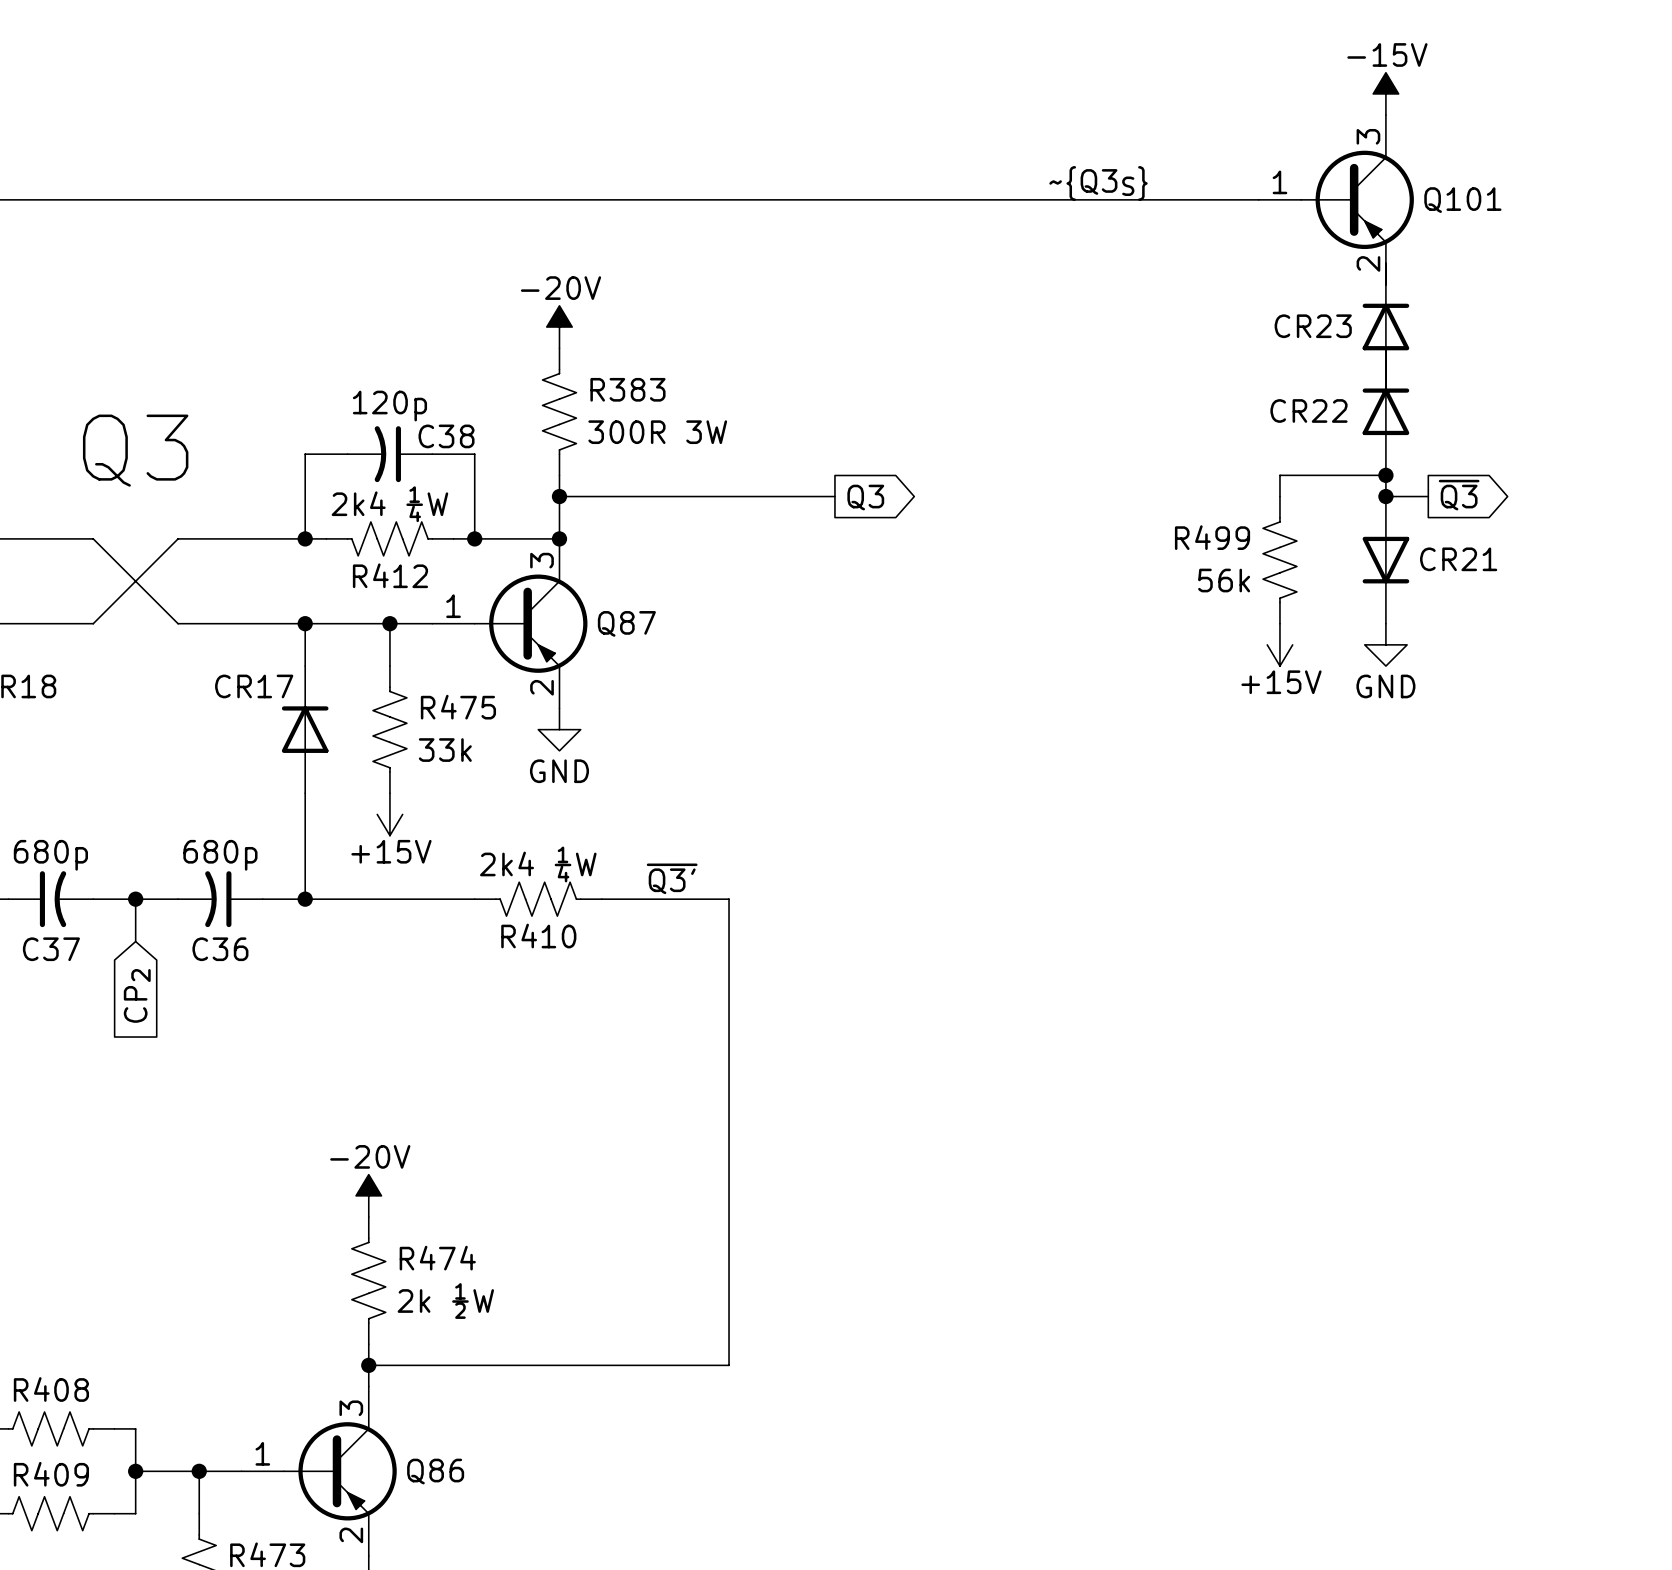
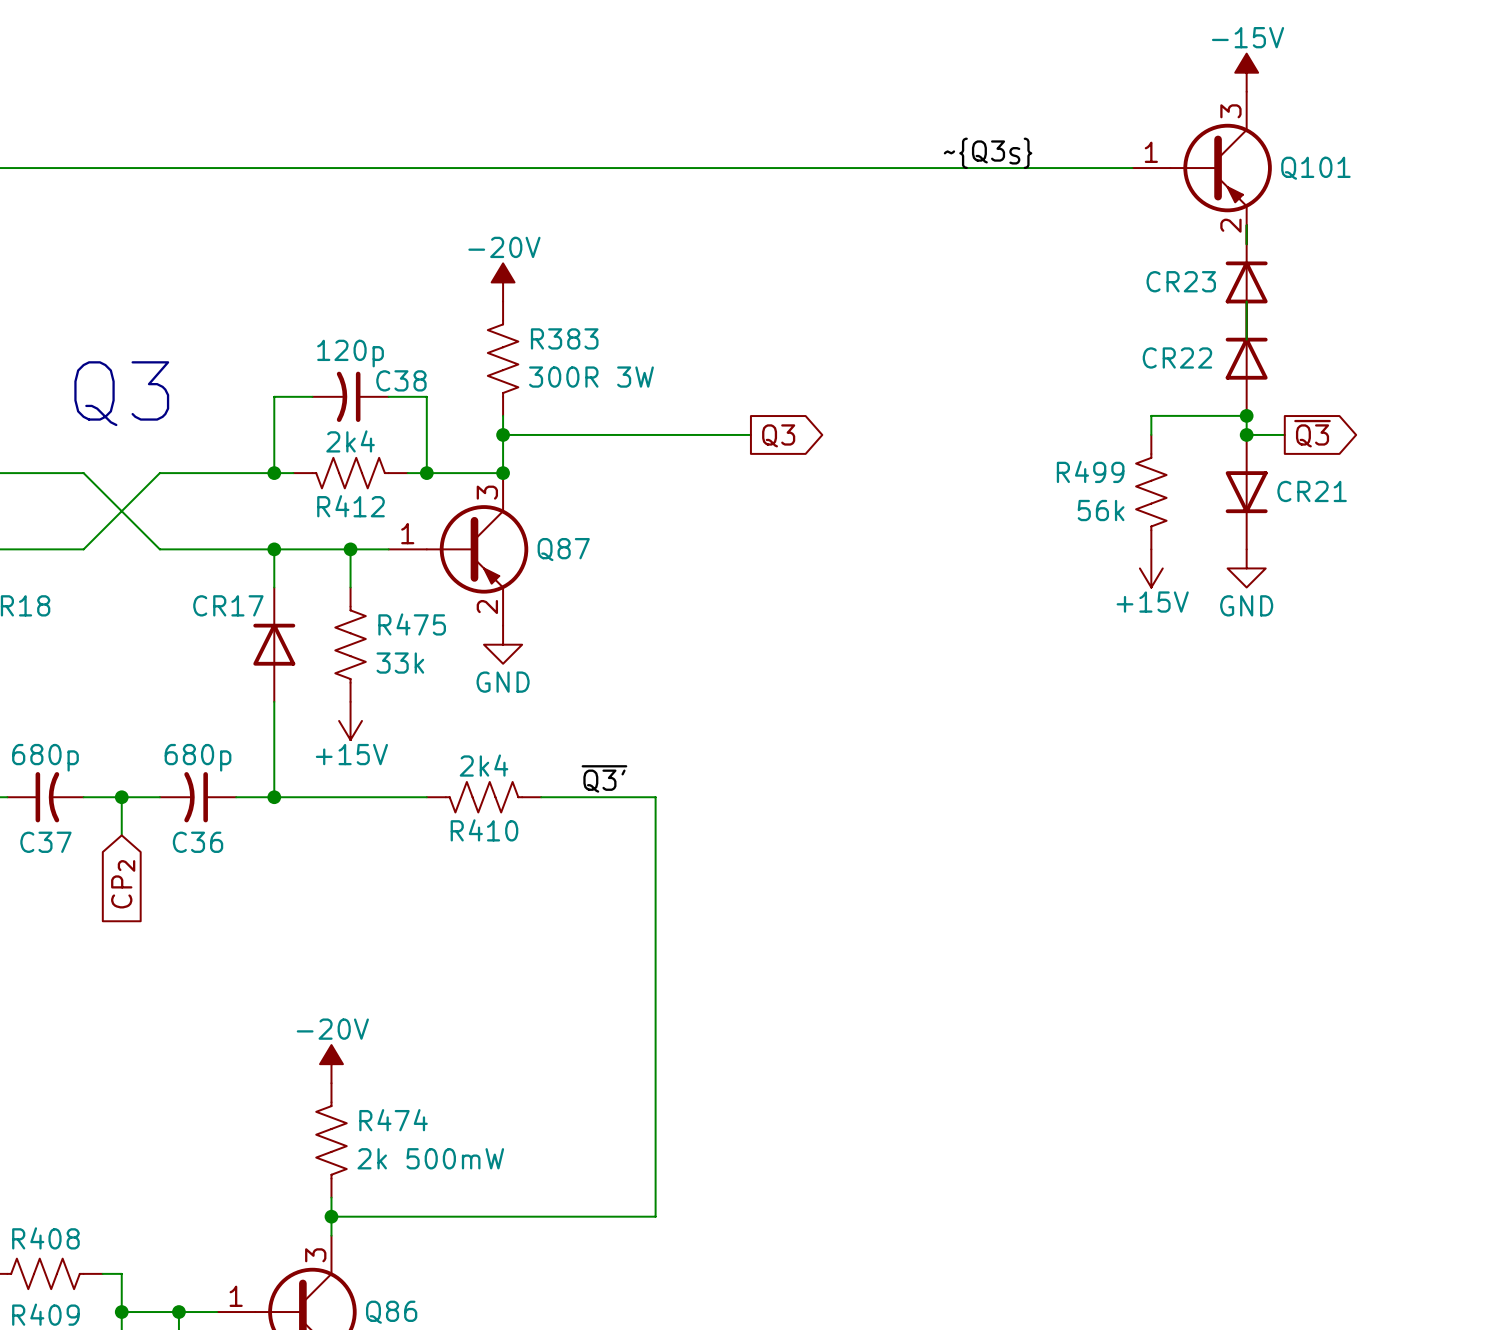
R412 value: 2k4 ¼W (389, 504) -> 2k4 (350, 441)
R410 value: 2k4 ¼W (538, 864) -> 2k4 (484, 765)
R474 value: 2k ½W (445, 1301) -> 2k 500mW (430, 1158)

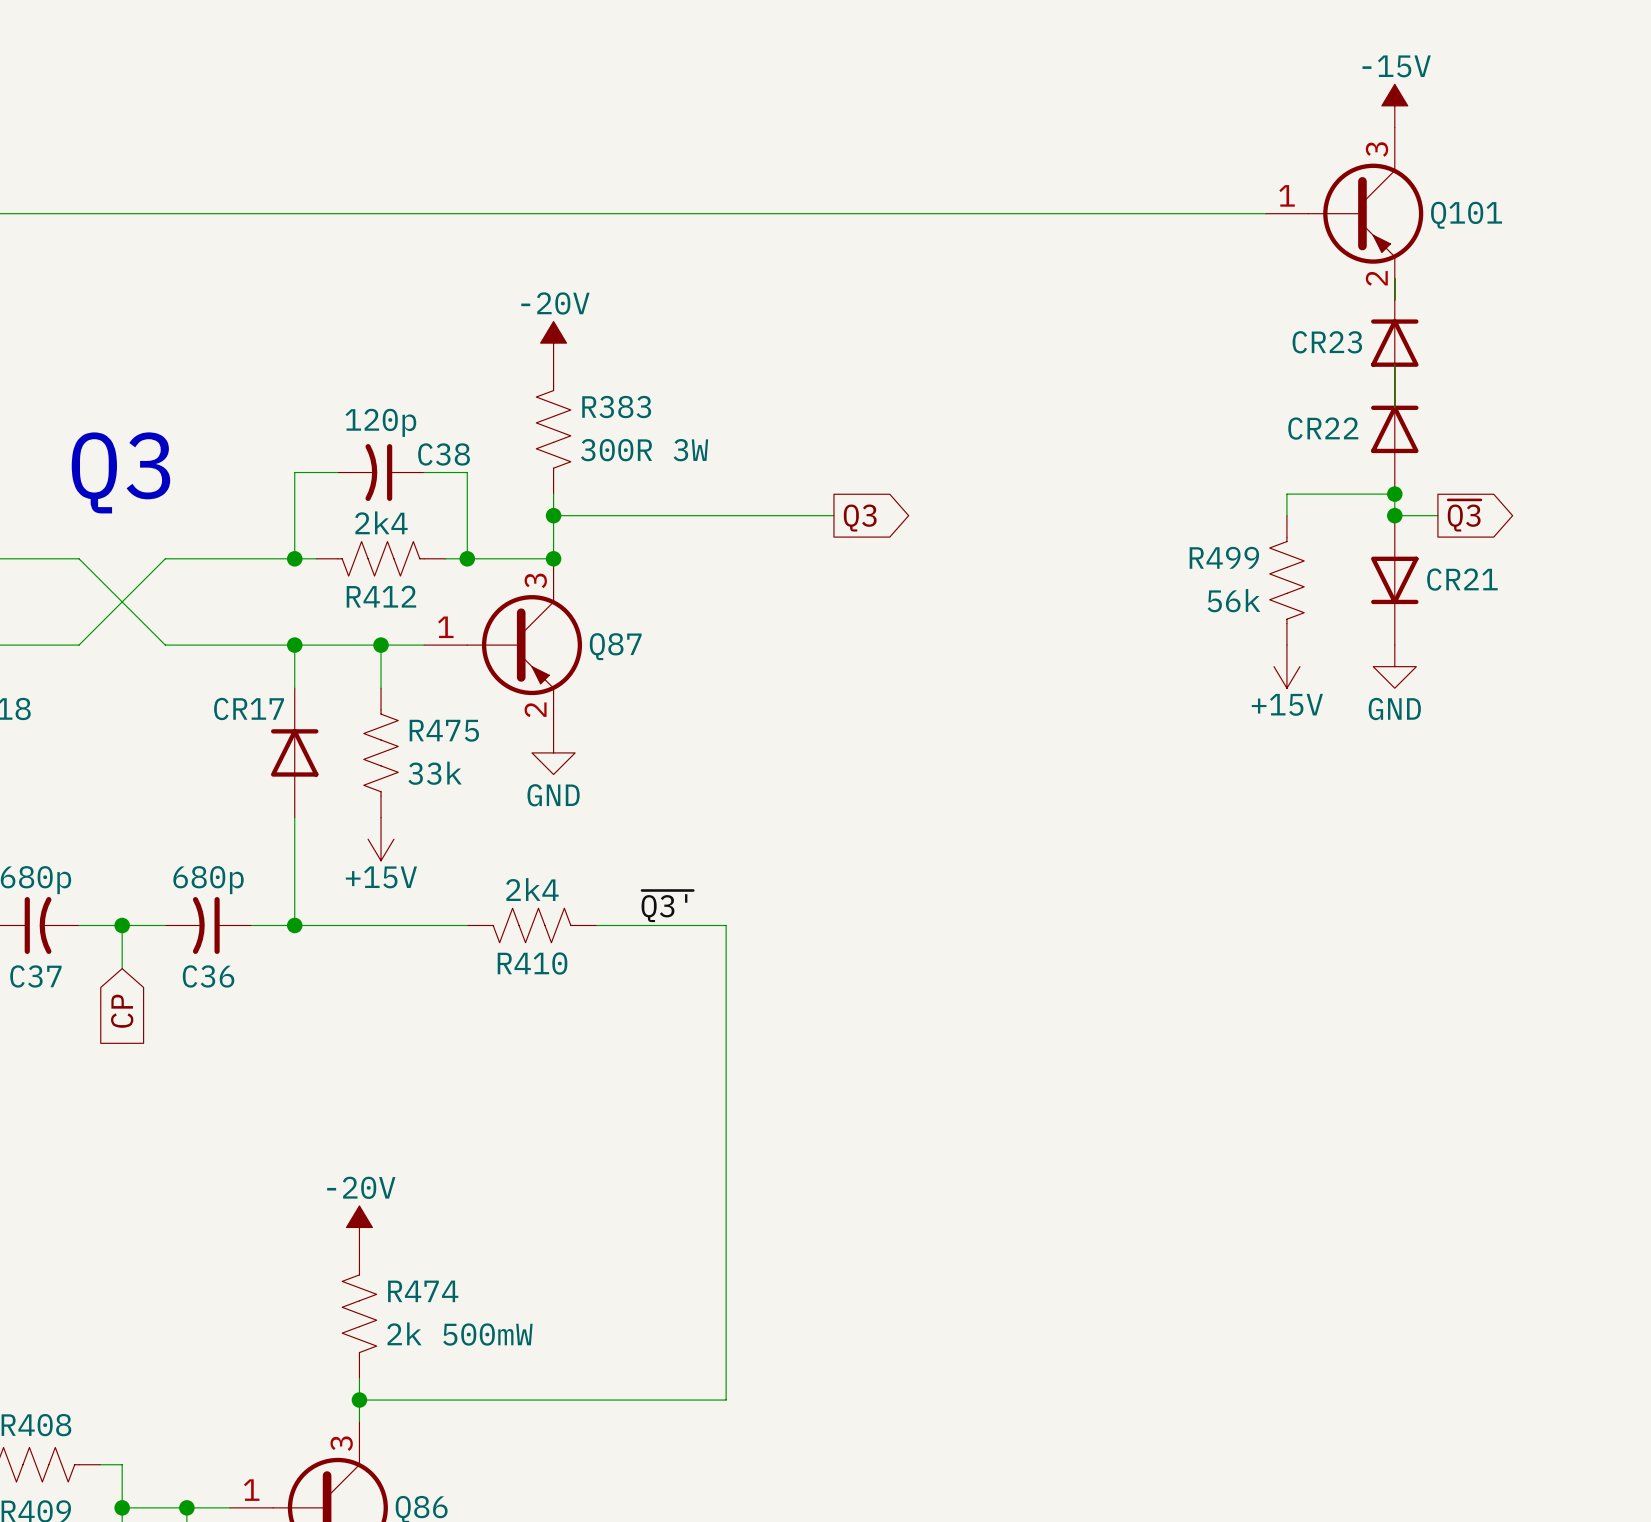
label: ~{Q3S} (988, 153) -> none
global label: CP2 (123, 884) -> CP (122, 1011)

